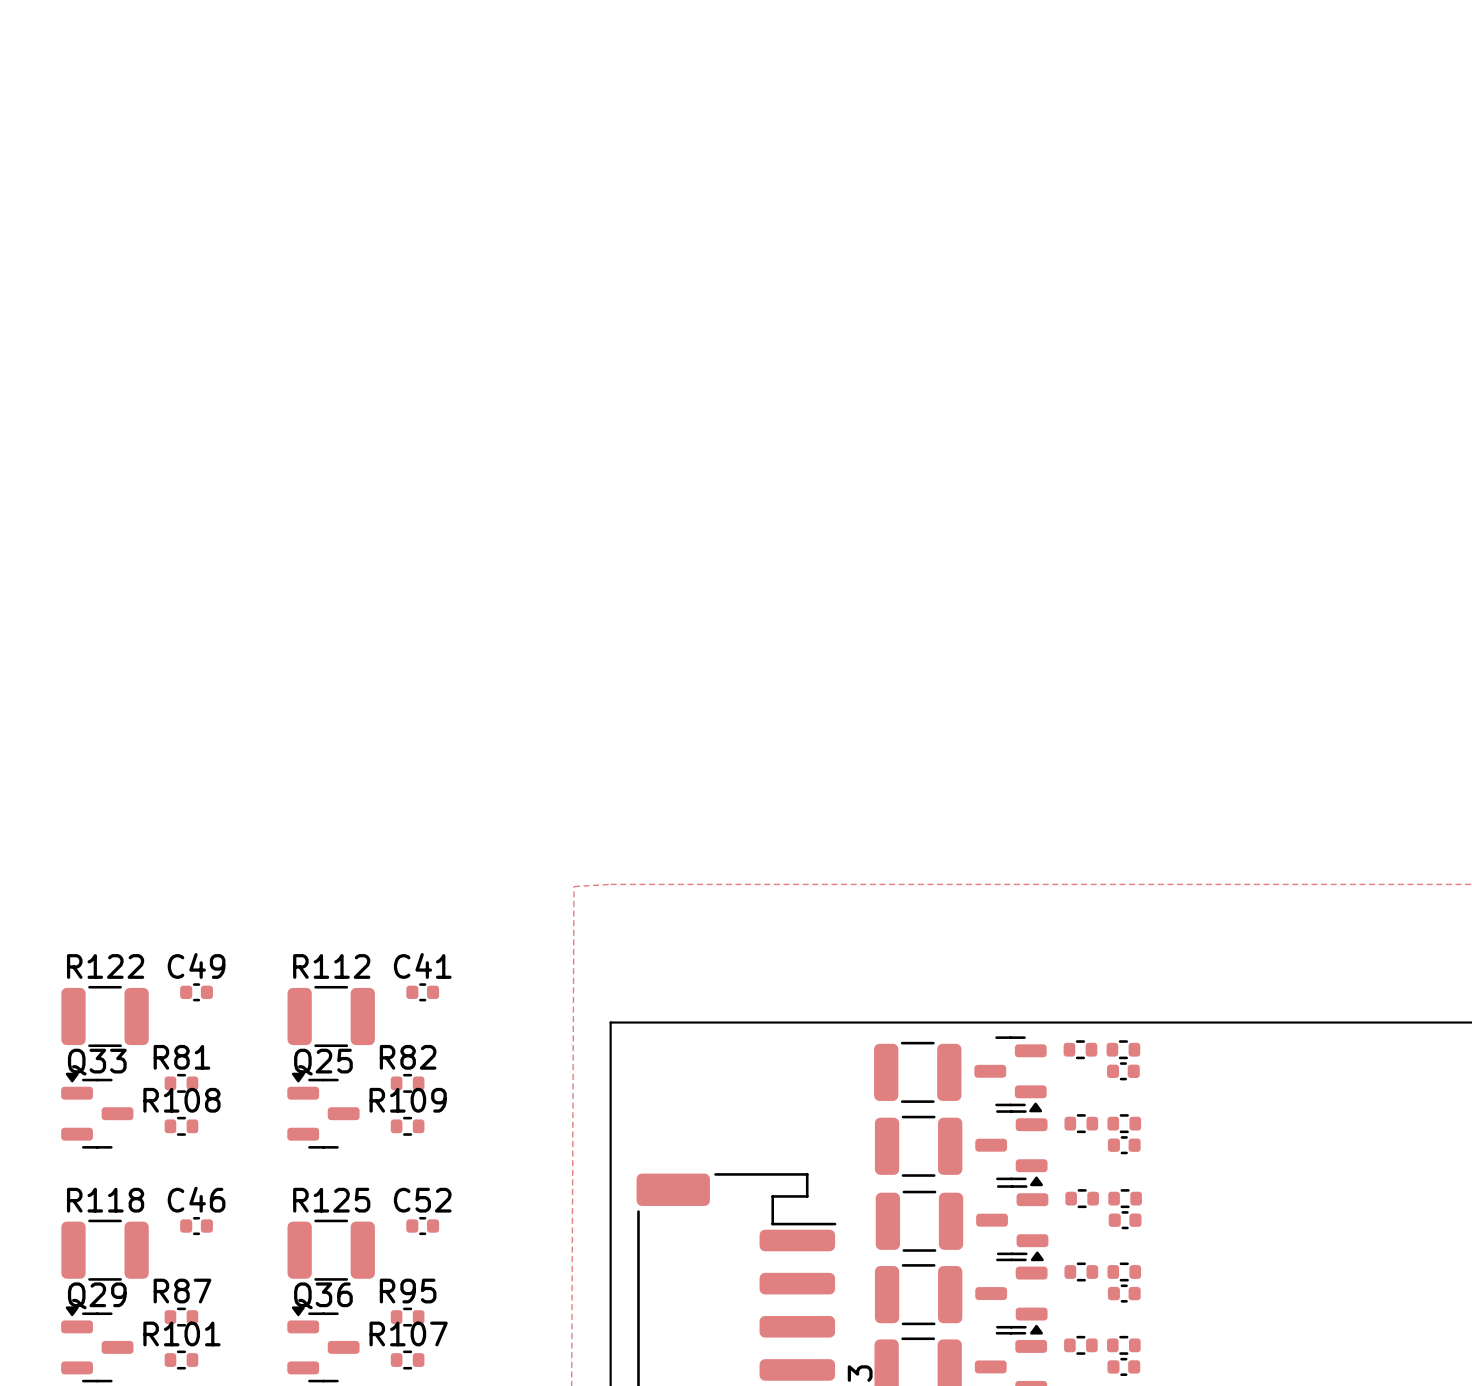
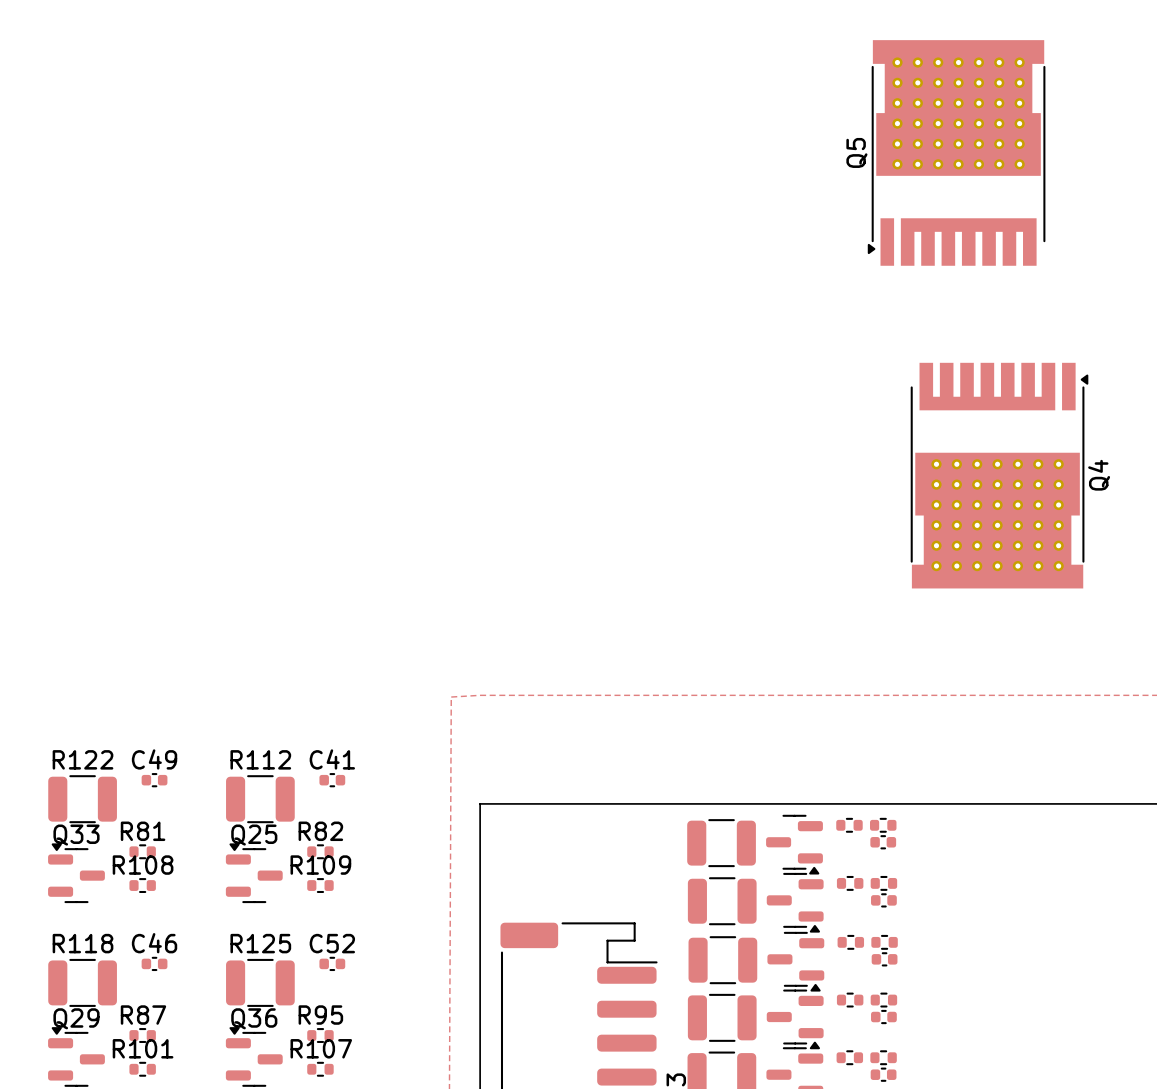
Q5: none -> (956, 152)
Q4: none -> (999, 475)

